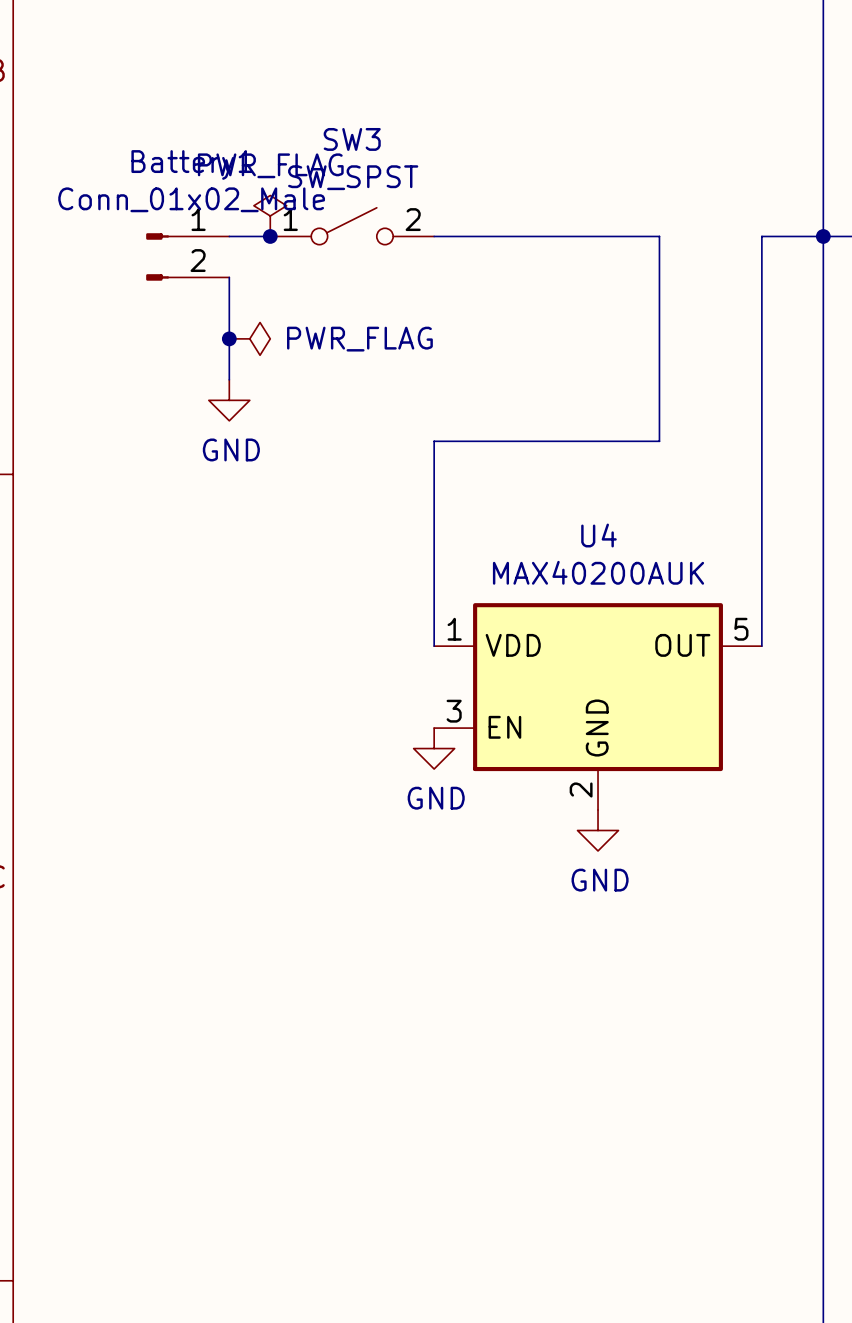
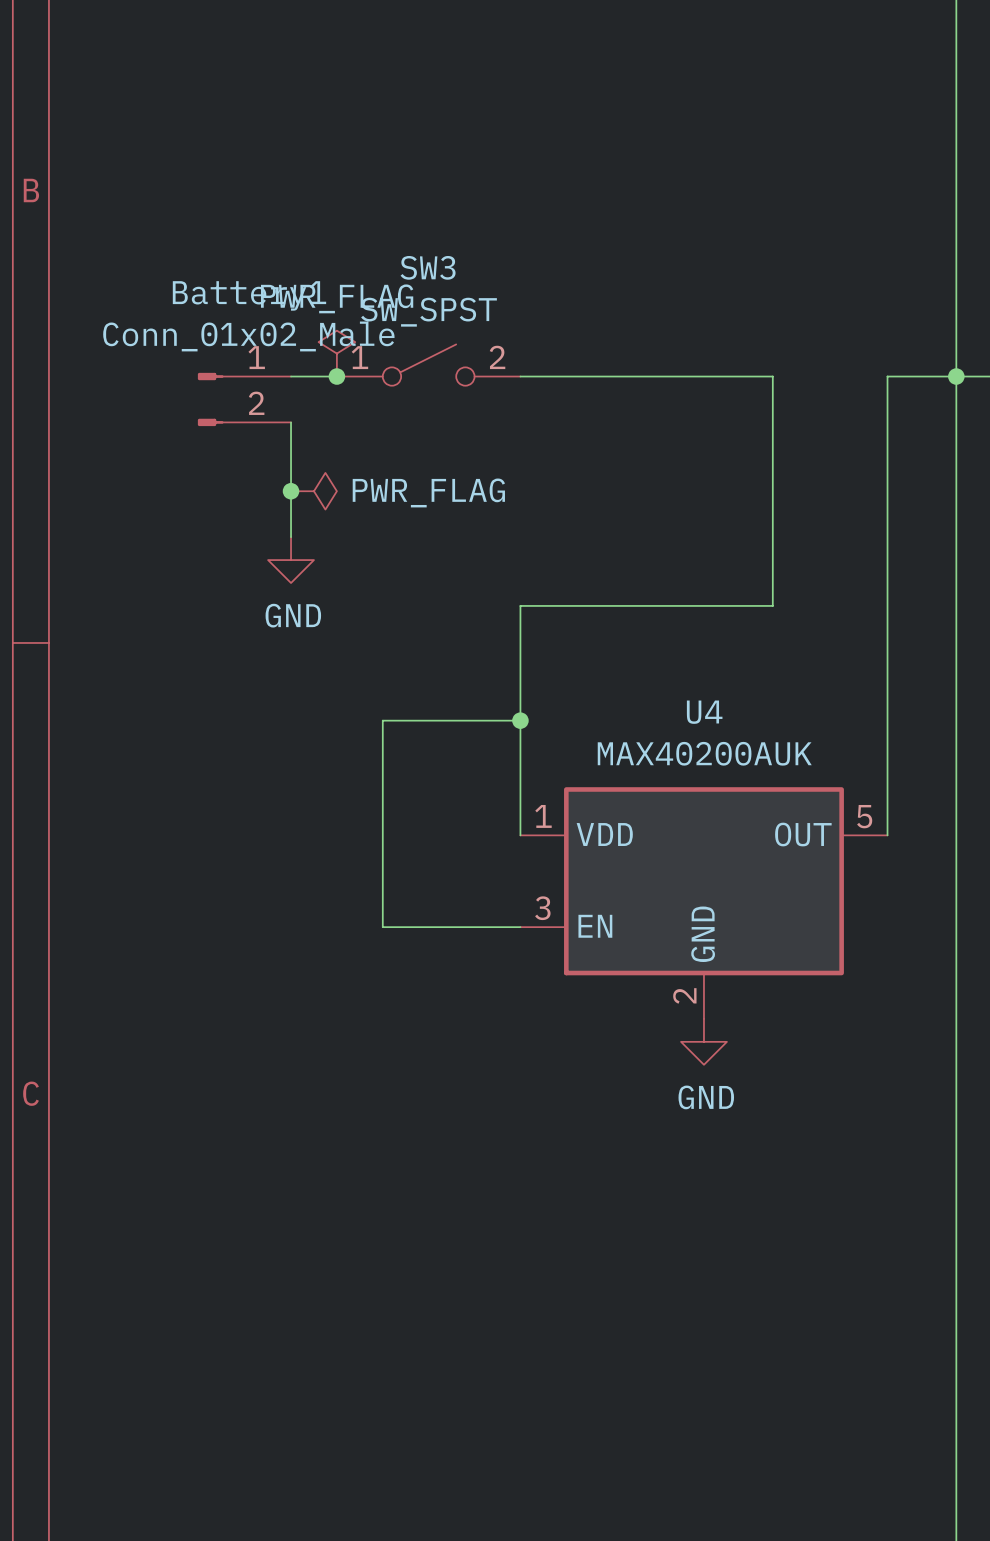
wire: none -> (520, 720) (382, 720) (382, 927) (520, 927)
junction: none -> (520, 720)
power symbol: GND (434, 748) -> none

